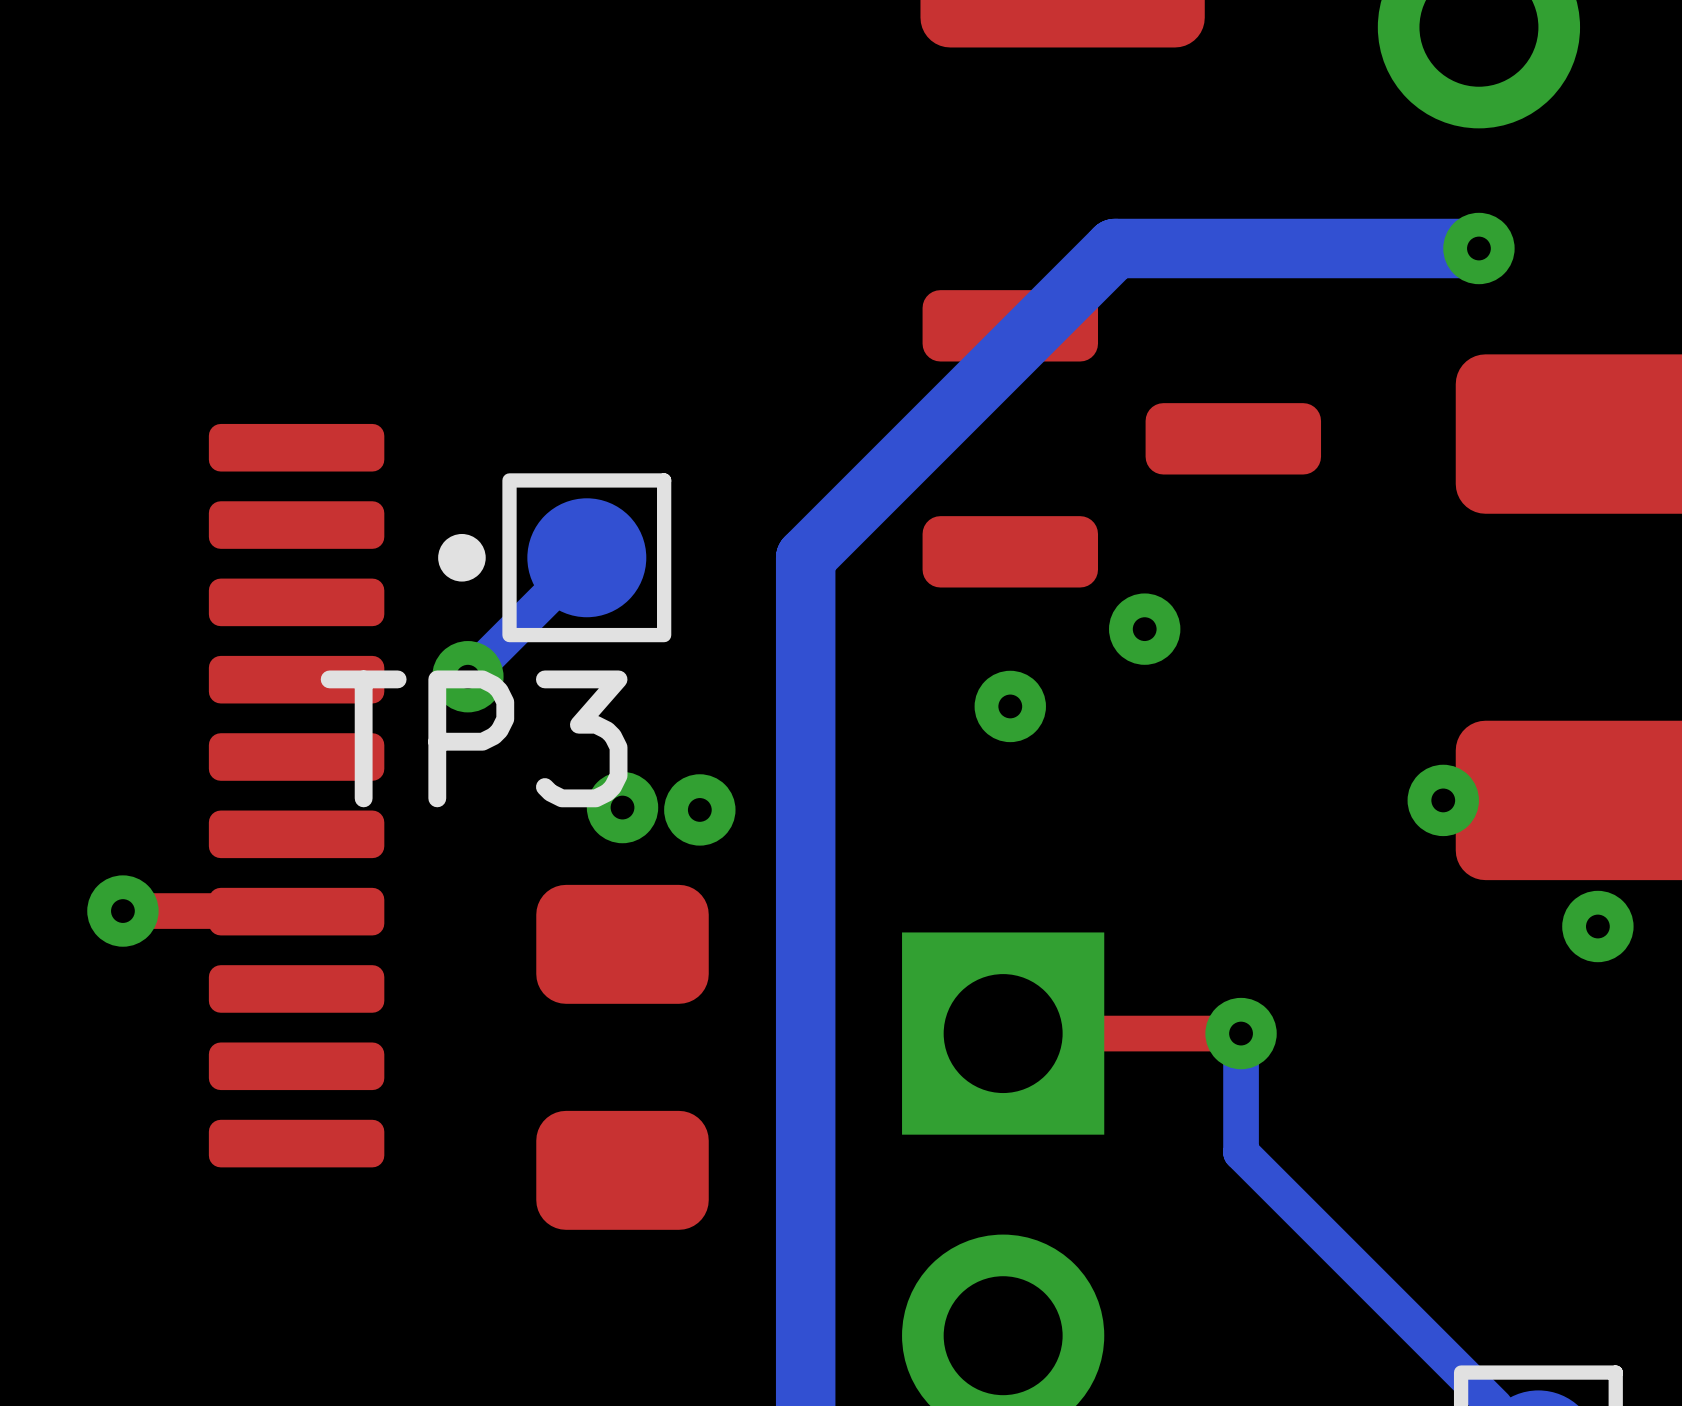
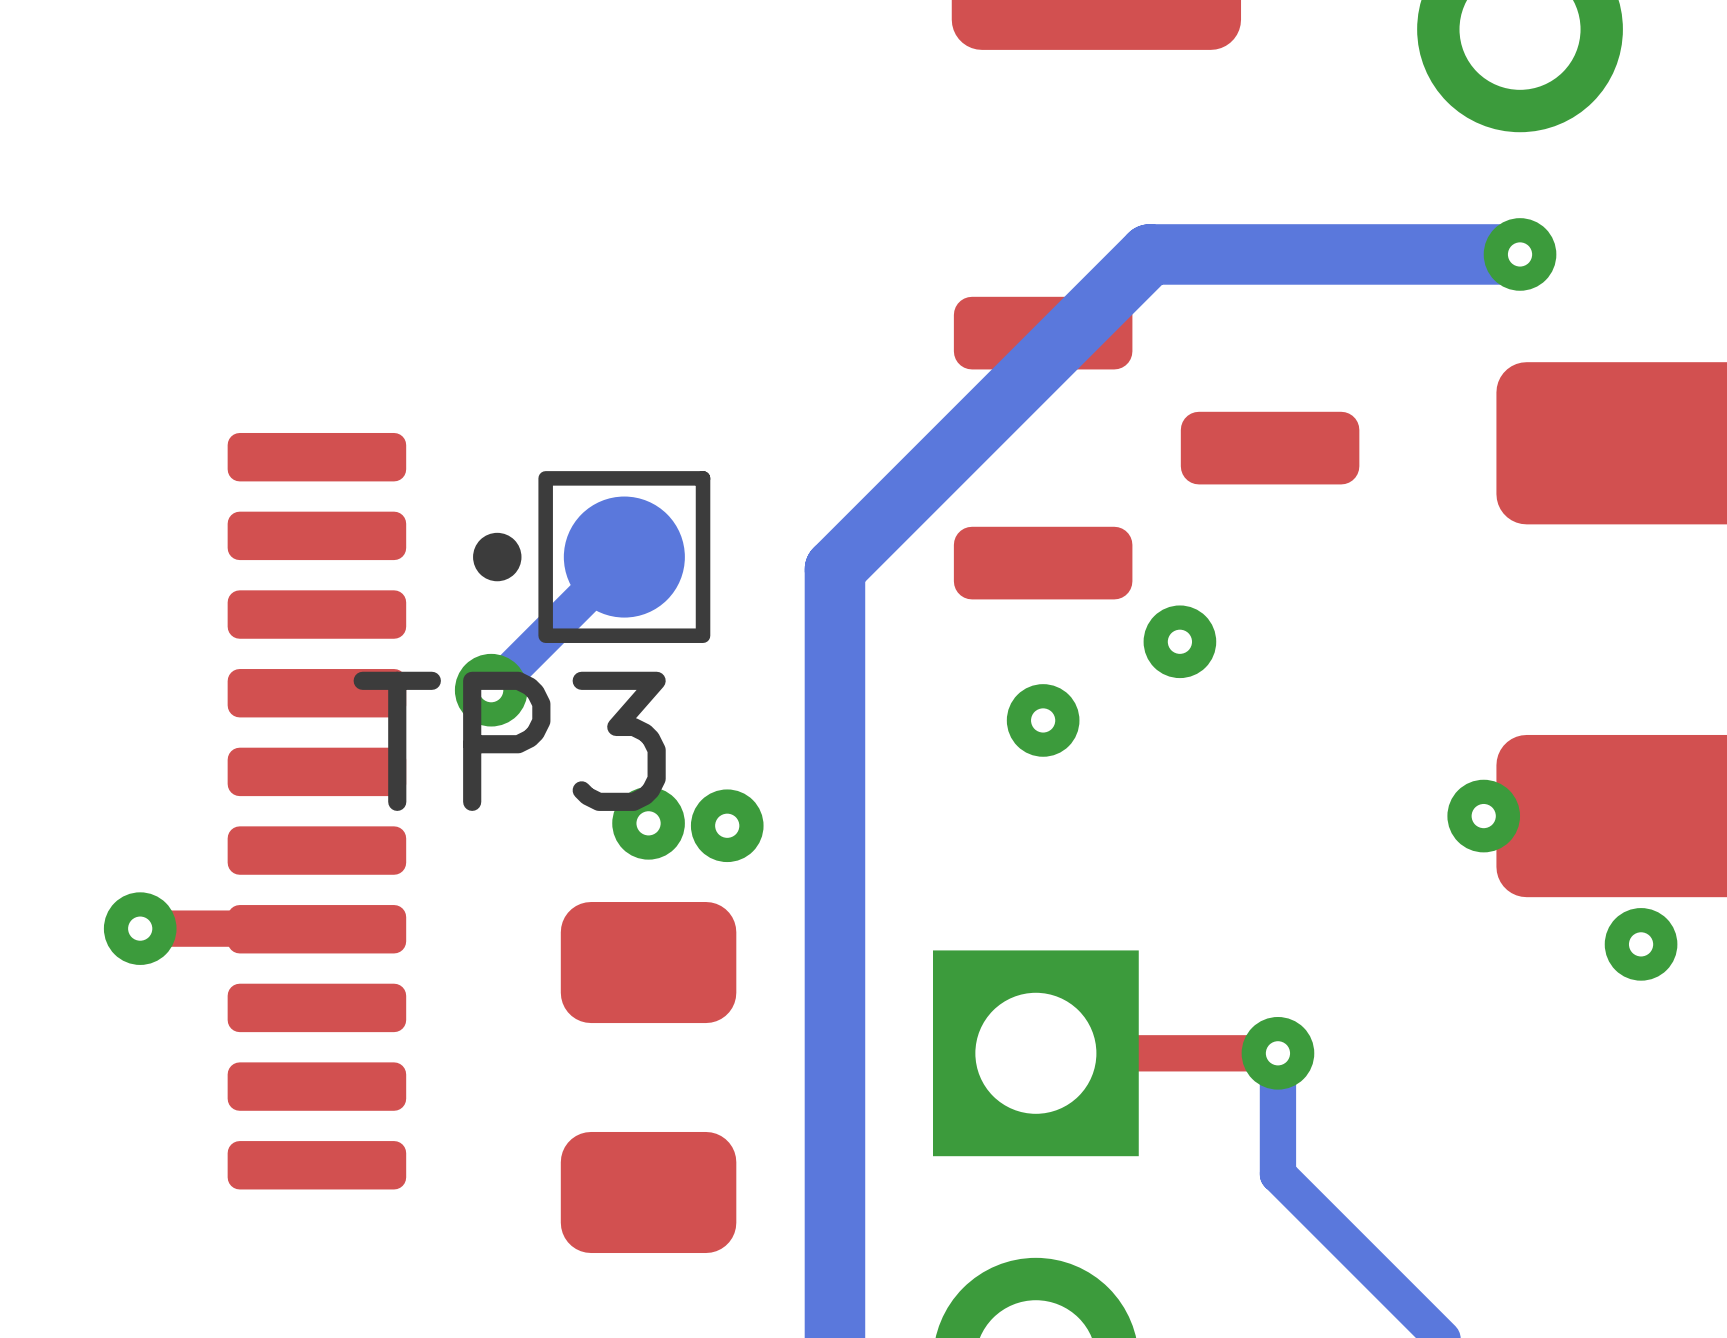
TP3 position: (554, 557) -> (591, 557)

